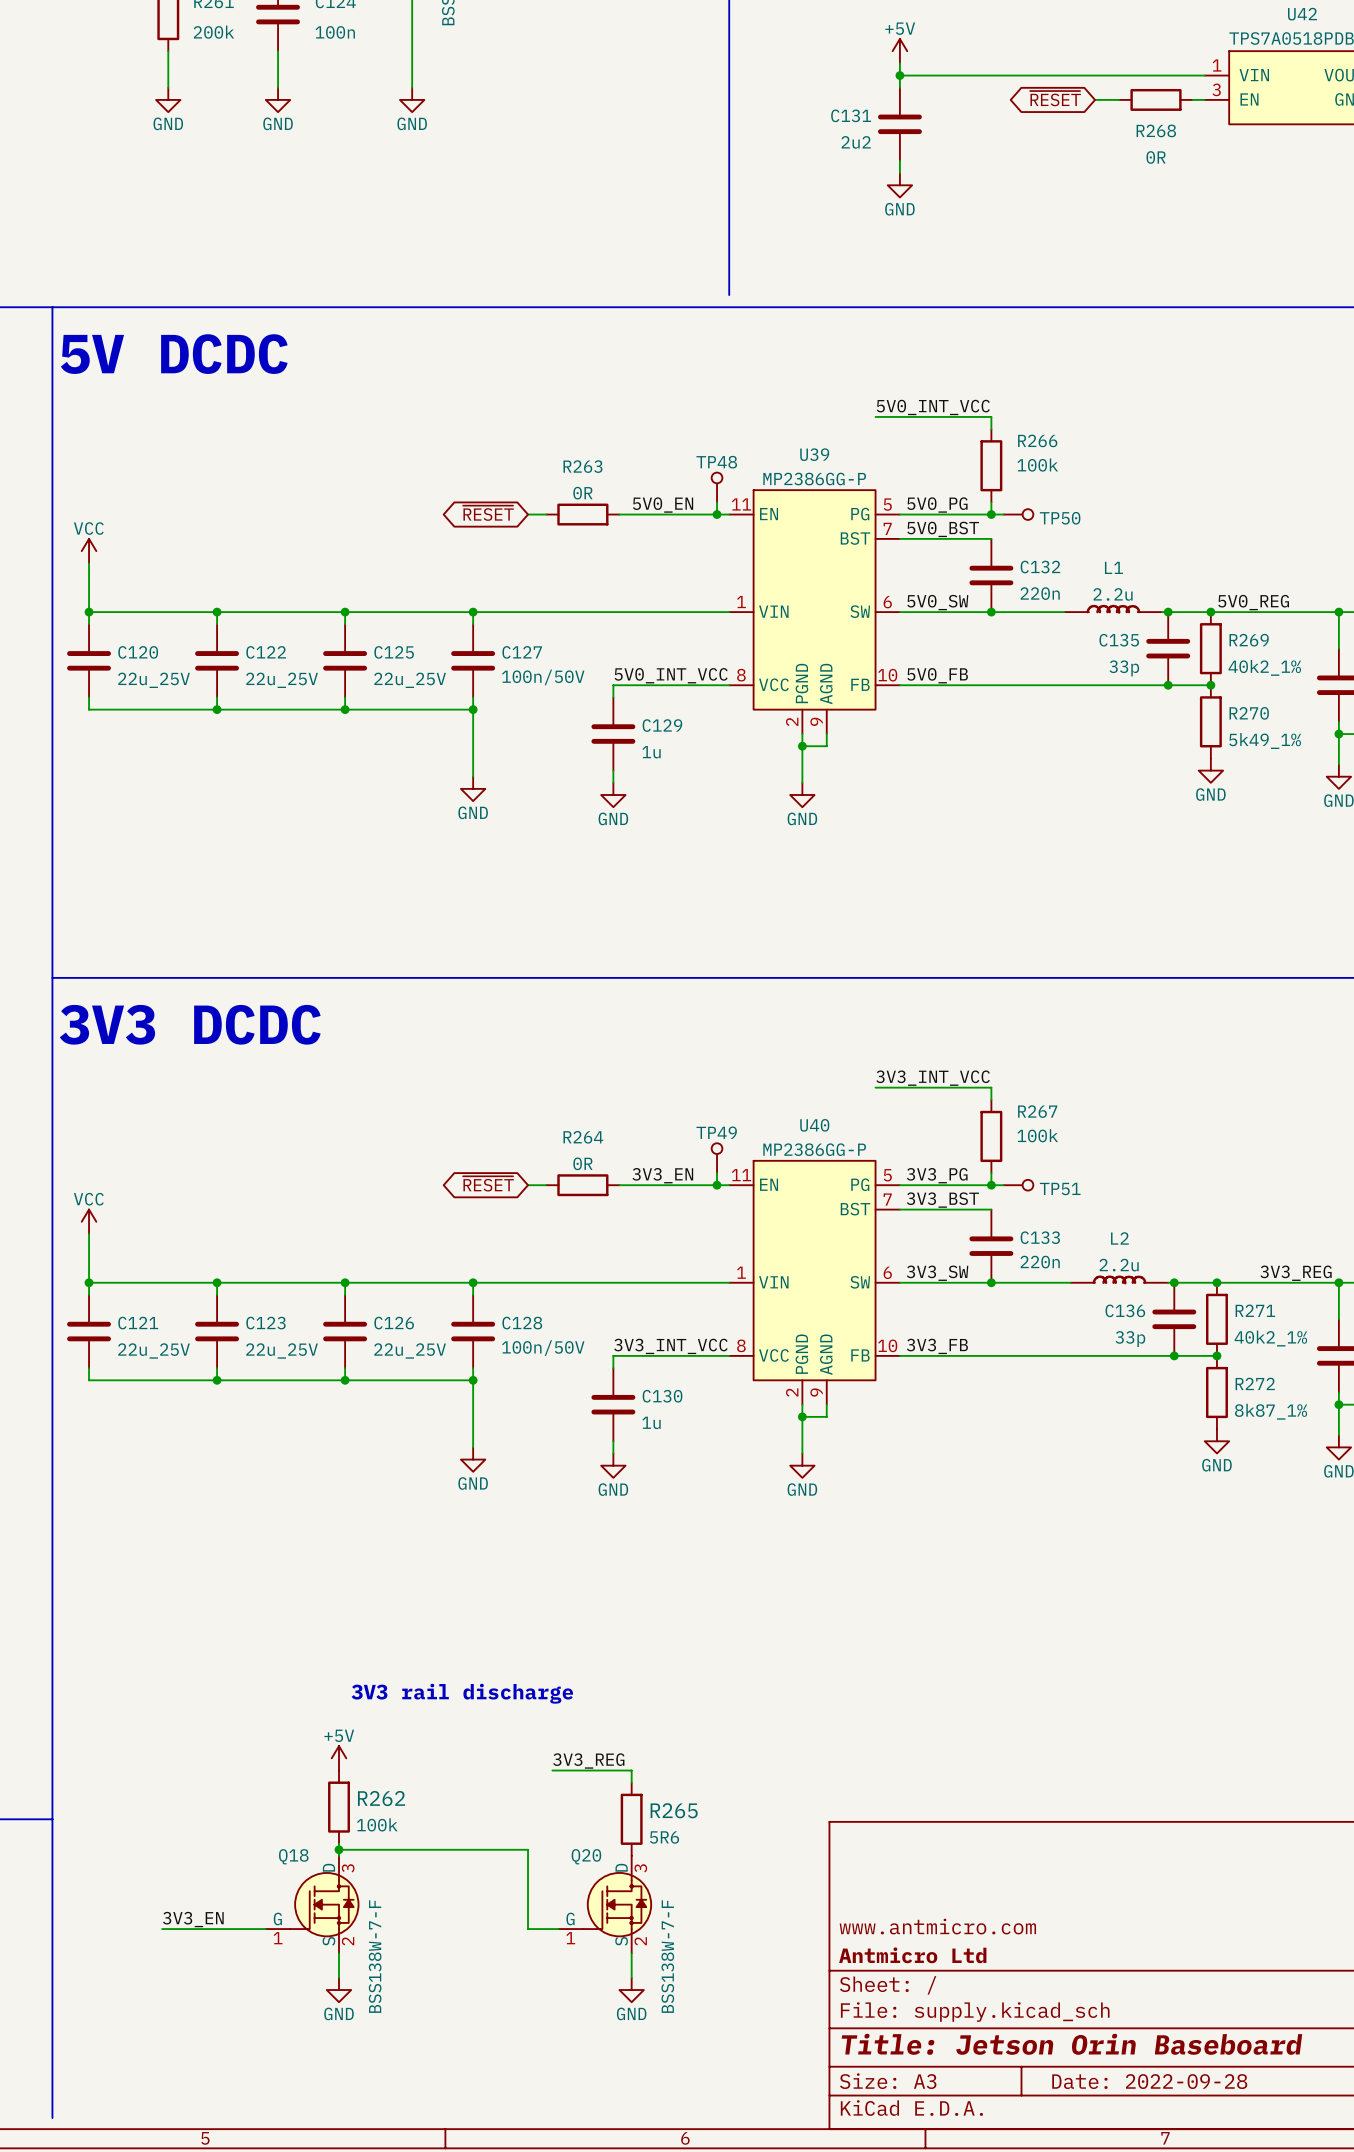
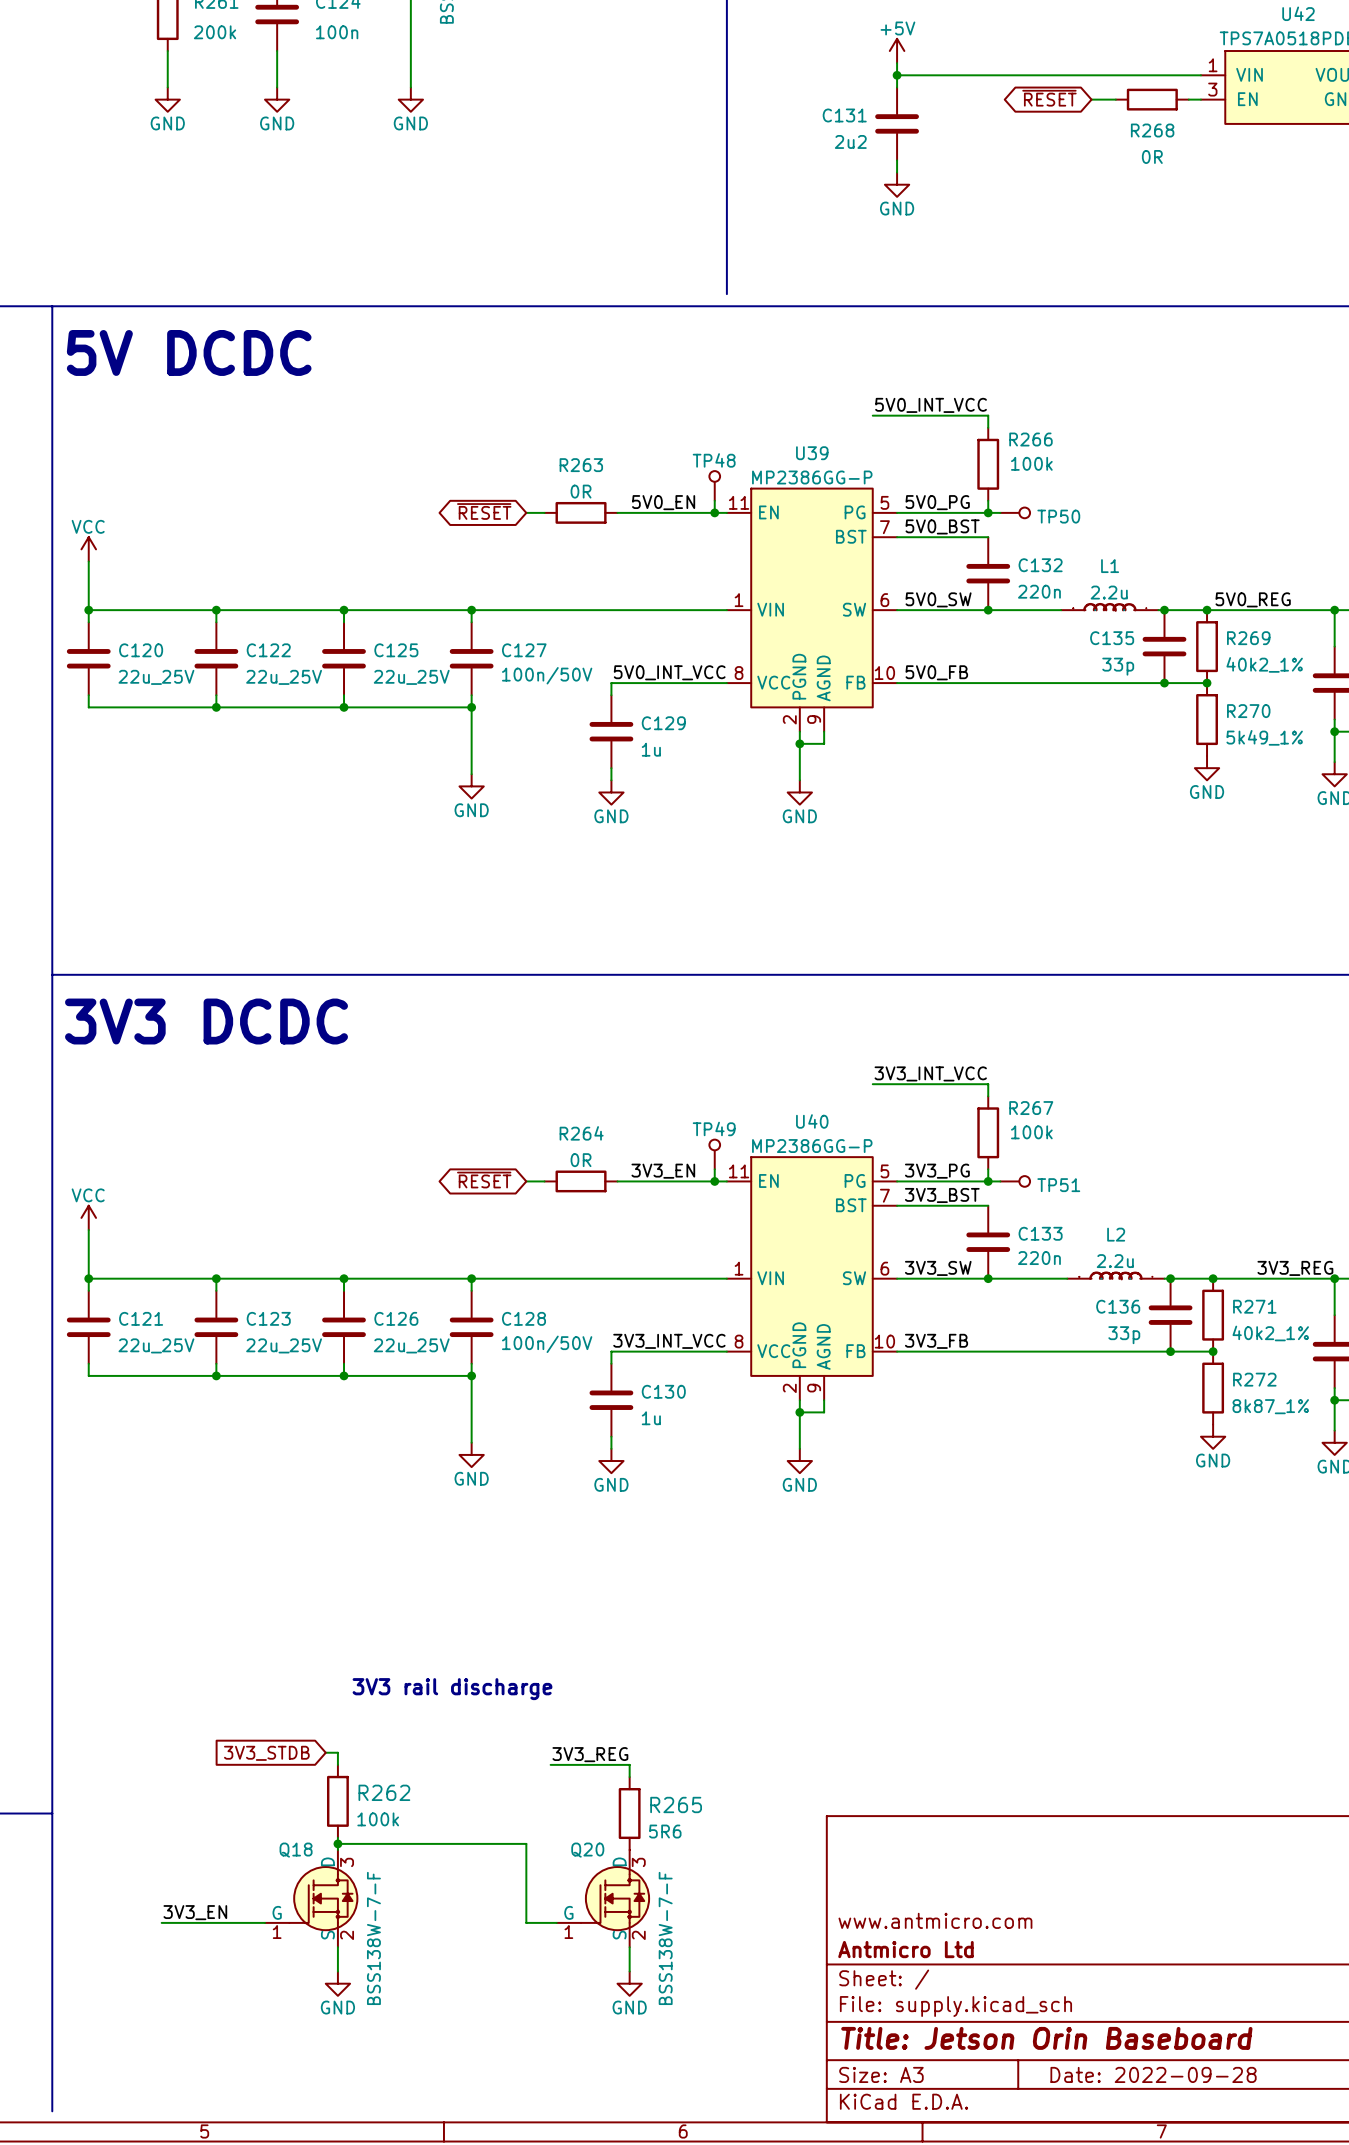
power symbol: +5V (339, 1758) -> none
global label: none -> 3V3_STDB (266, 1753)

